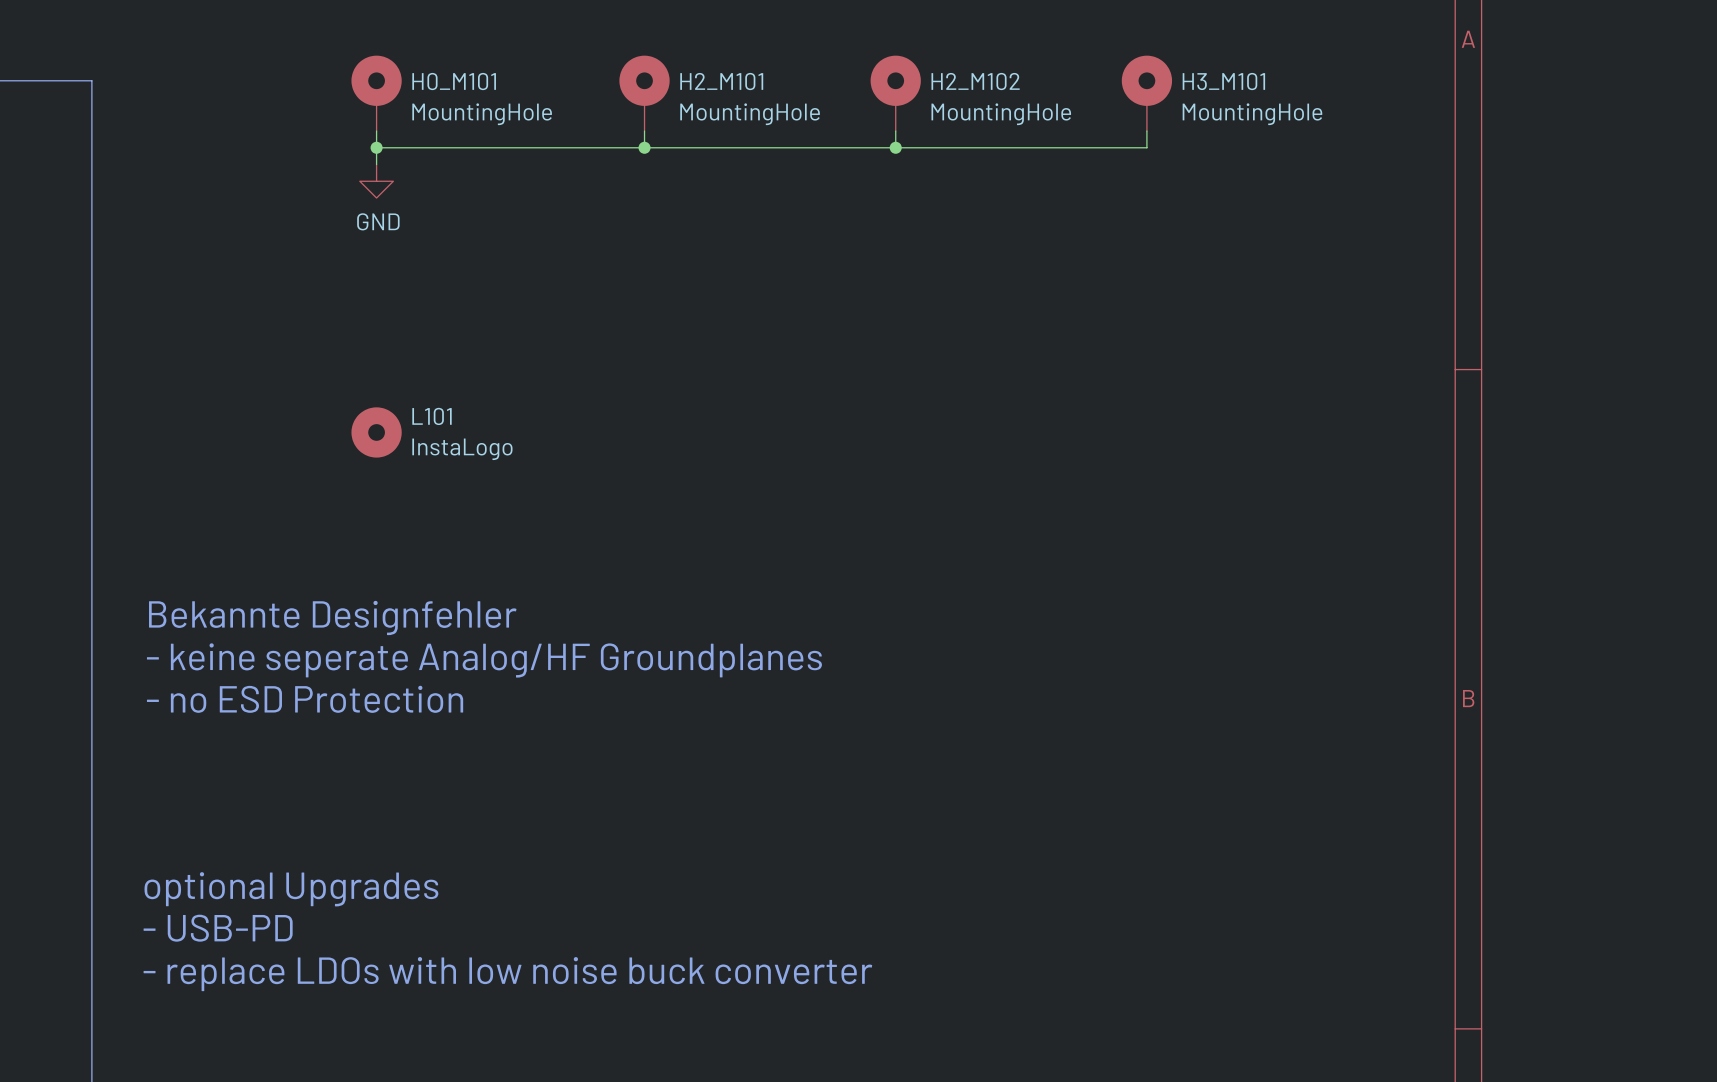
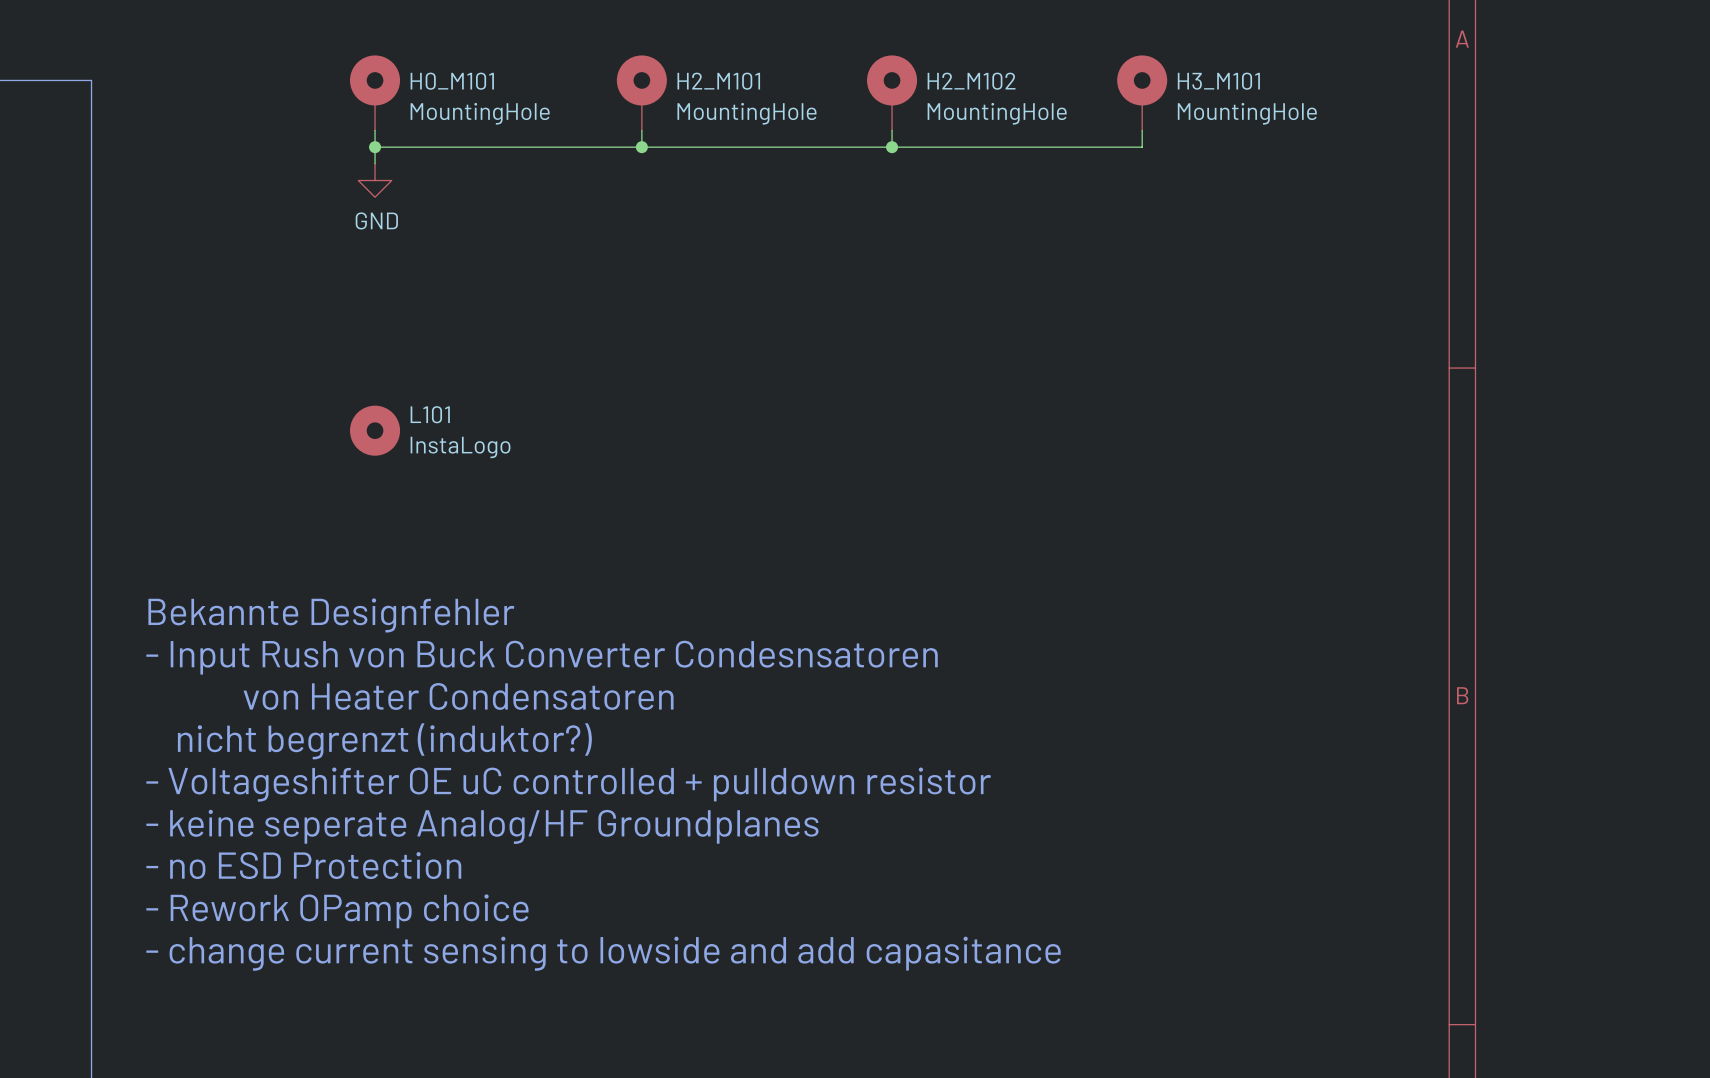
text: - keine seperate Analog/HF Groundplanes (484, 660) -> - Input Rush von Buck Converter Condesnsatoren (542, 657)
text: - no ESD Protection (305, 699) -> von Heater Condensatoren (458, 696)
text: none -> nicht begrenzt (induktor?) (384, 741)
text: none -> - Voltageshifter OE uC controlled + pulldown resistor (568, 784)
text: none -> - keine seperate Analog/HF Groundplanes (482, 826)
text: none -> - no ESD Protection (303, 865)
text: optional Upgrades (291, 889) -> none
text: none -> - Rework OPamp choice (337, 911)
text: - USB-PD (218, 928) -> none
text: none -> - change current sensing to lowside and add capasitance (603, 953)
text: - replace LDOs with low noise buck converter (507, 974) -> none

